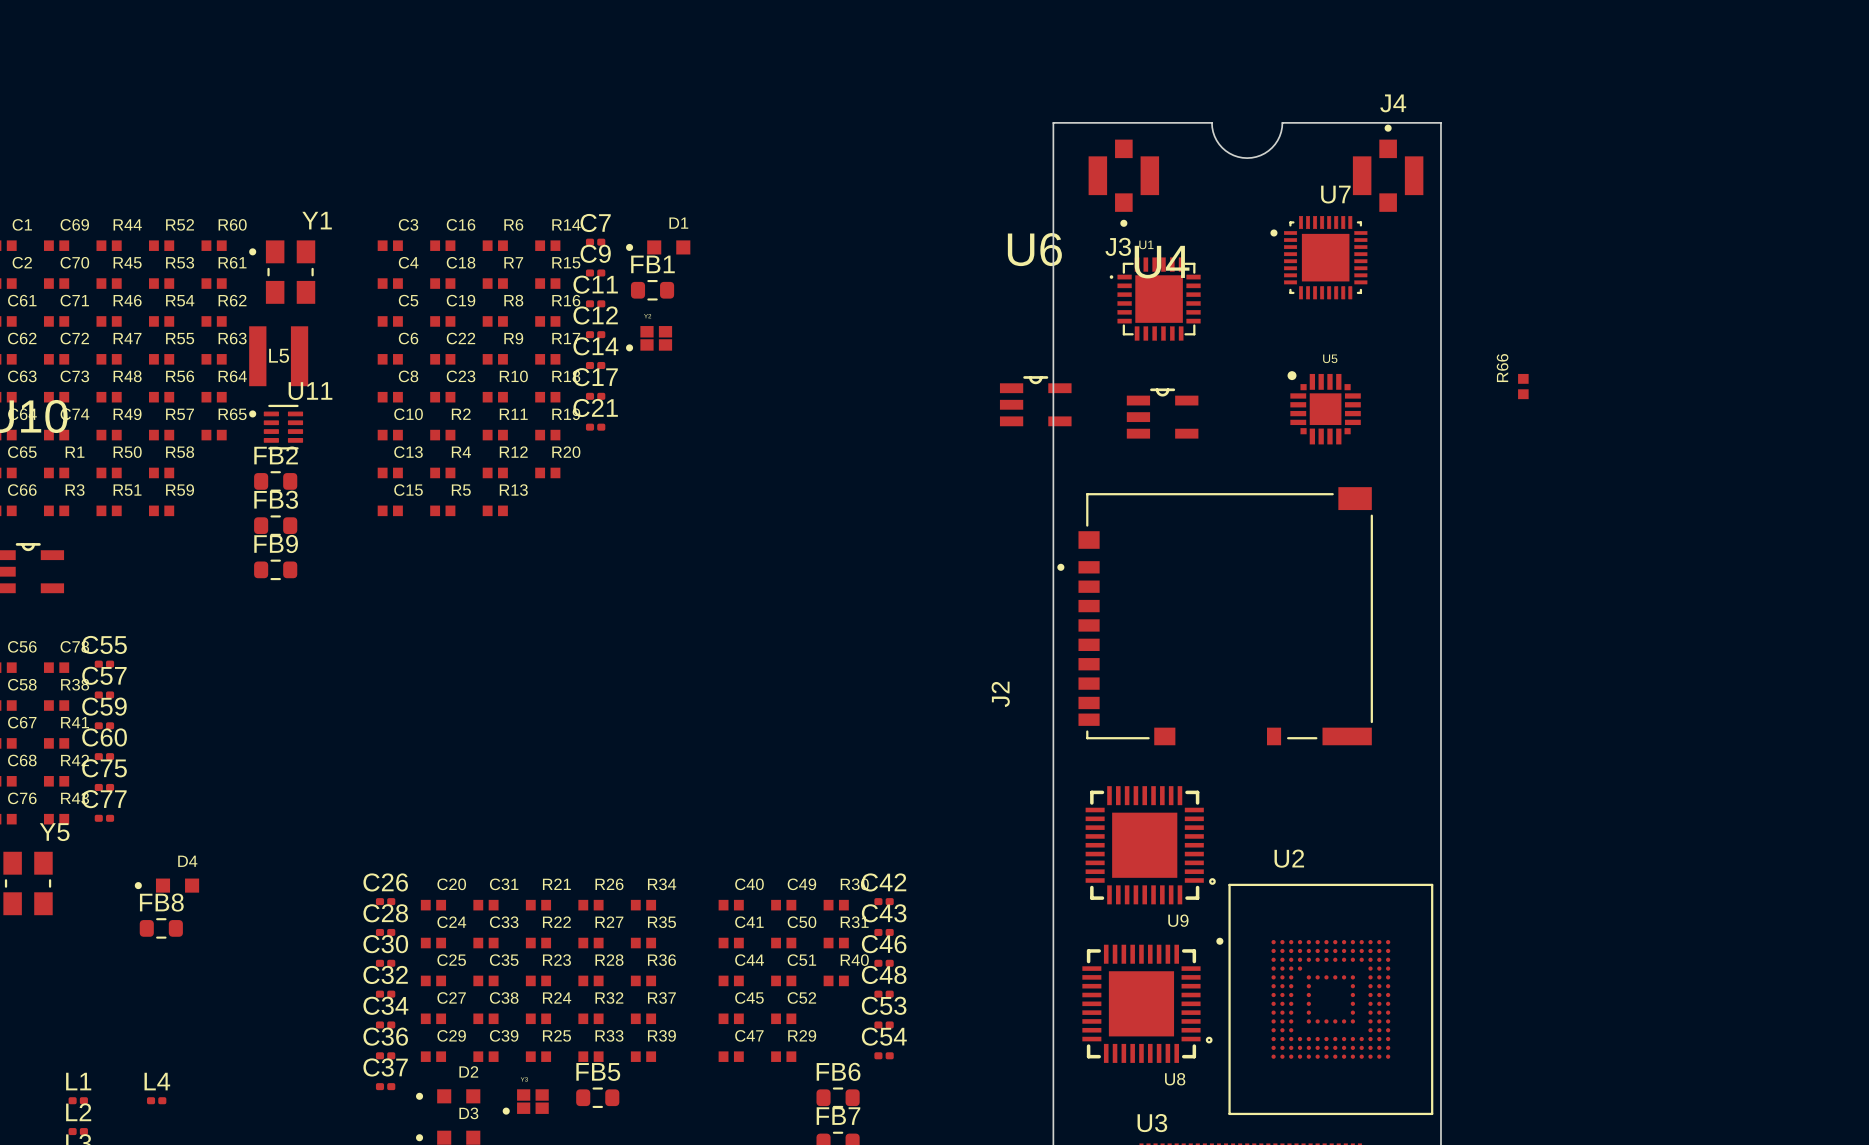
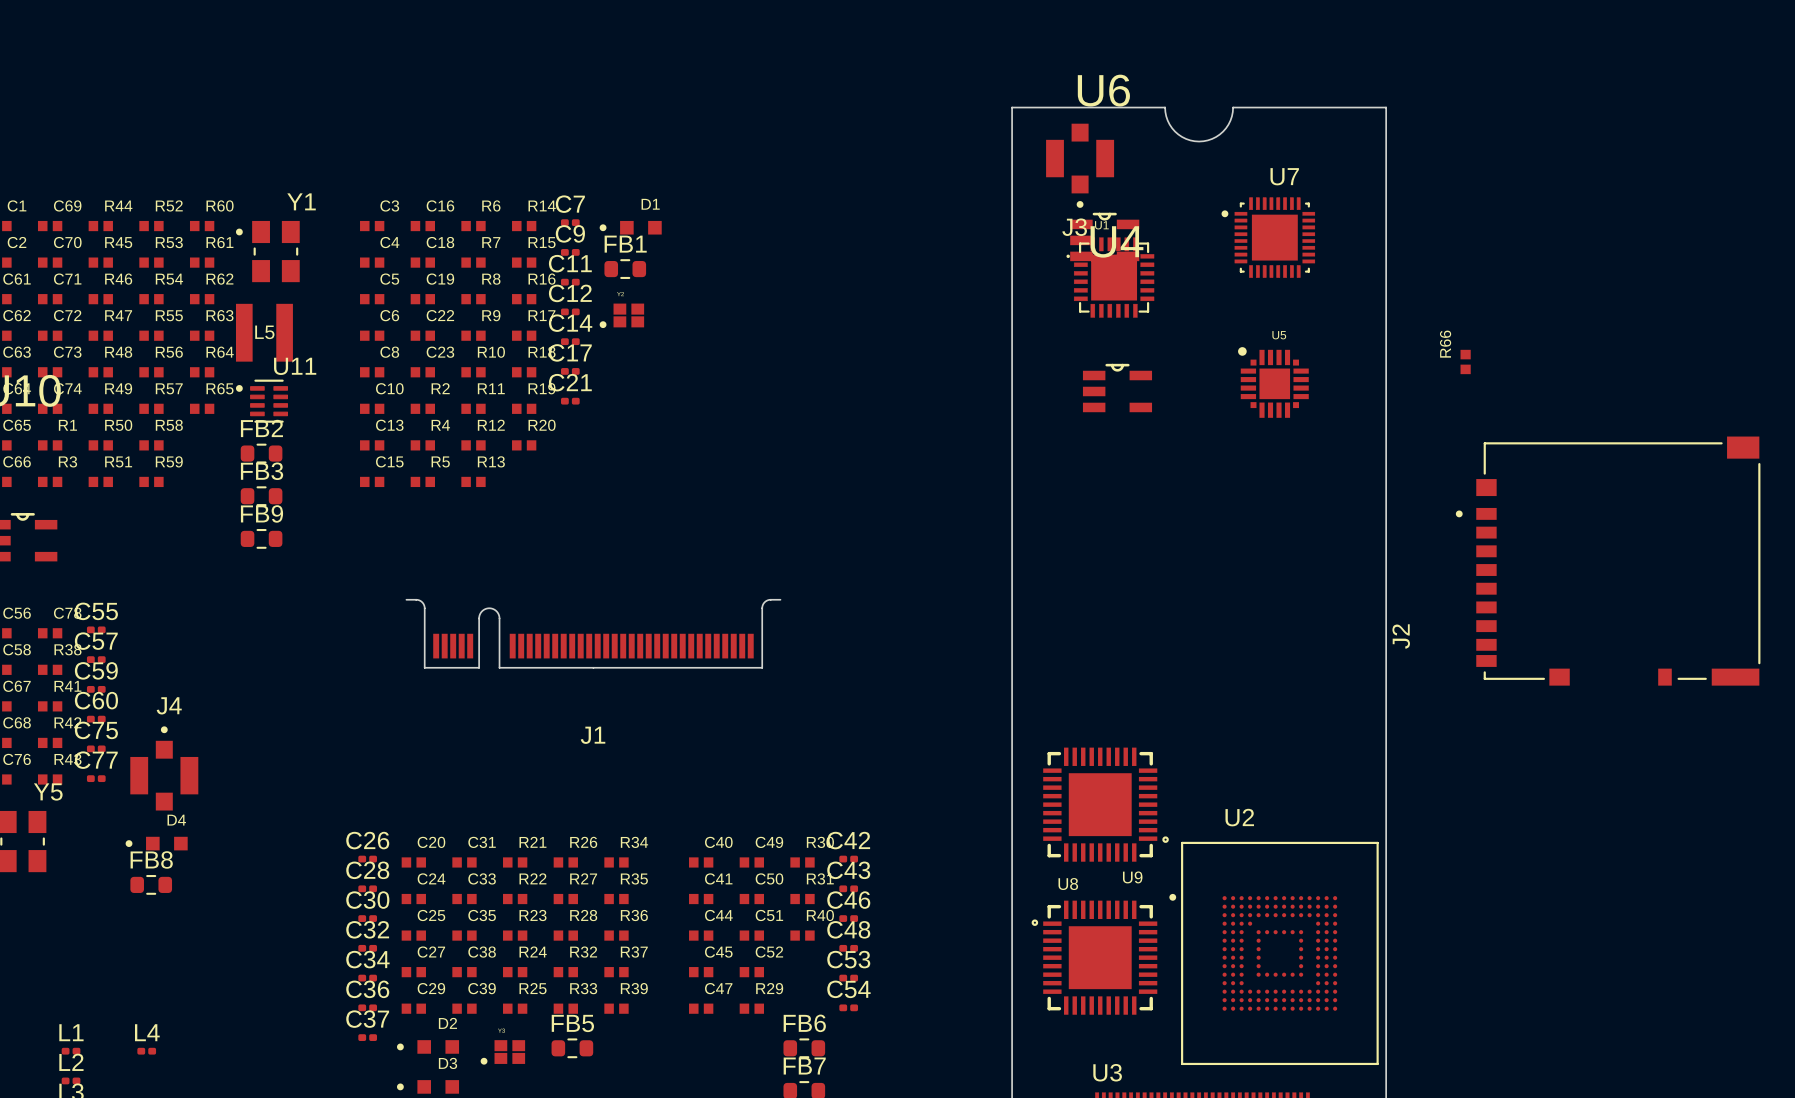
J4 position: (1388, 168) -> (164, 768)
U6 position: (1035, 401) -> (1104, 236)
J2 position: (1215, 616) -> (1608, 561)
J1: none -> (593, 633)
U8 rotation: 0° (1147, 1003) -> 180° (1094, 957)

